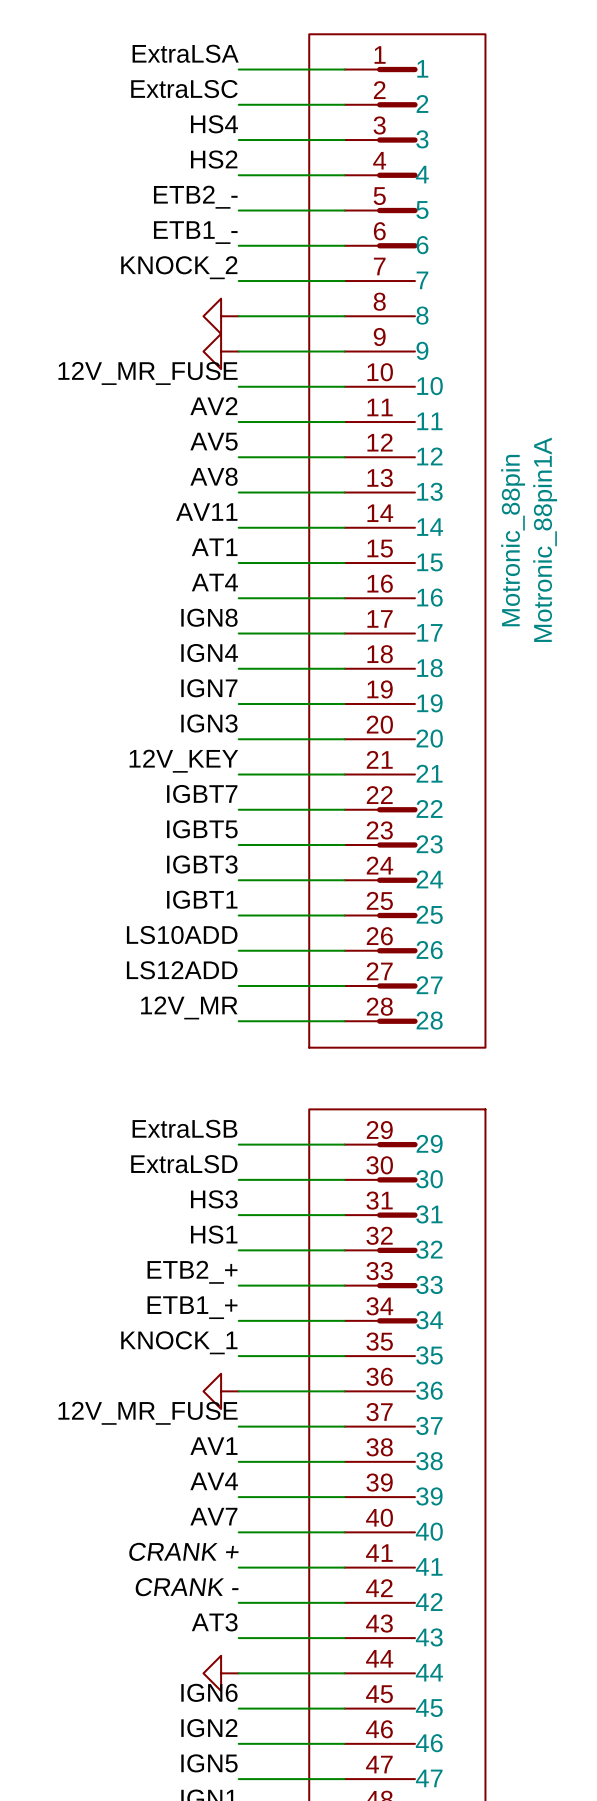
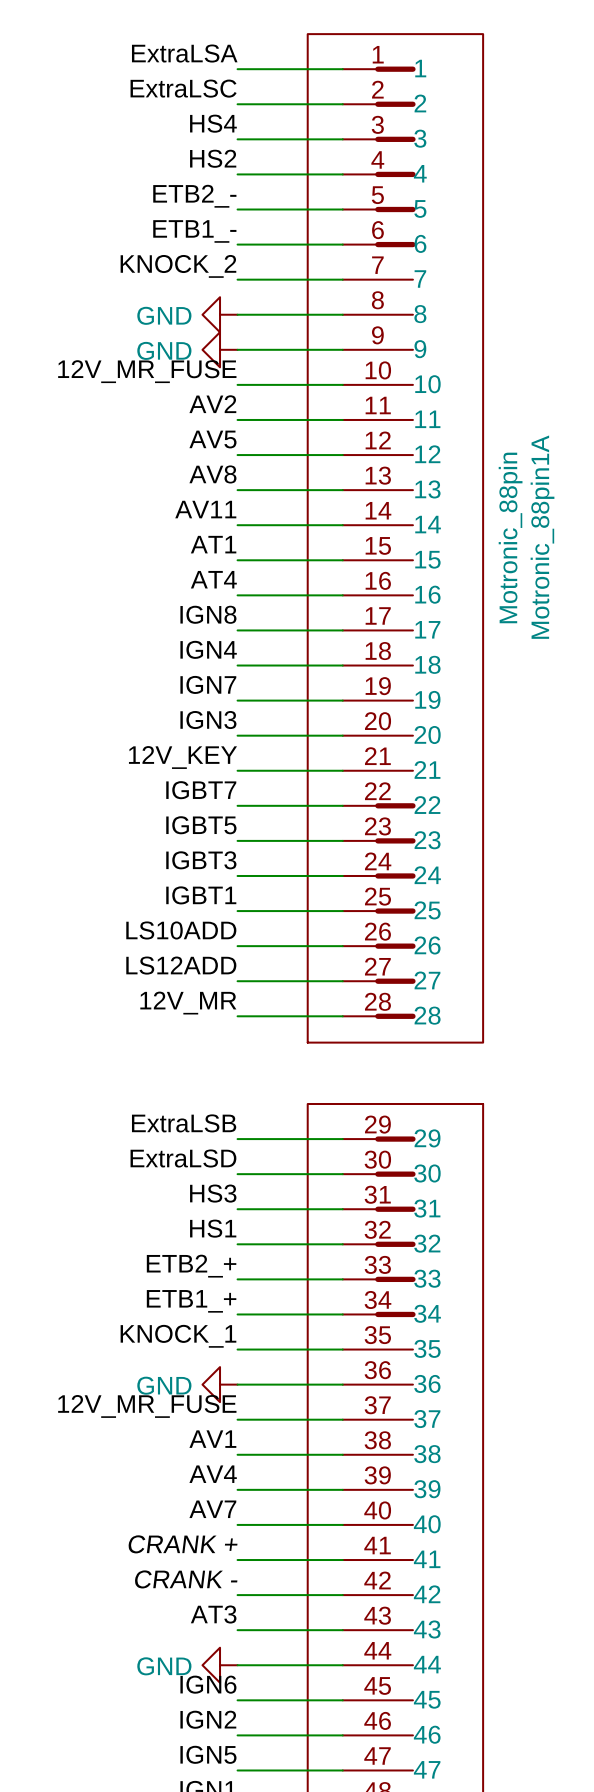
power symbol text: none -> GND (164, 315)
power symbol text: none -> GND (164, 350)
power symbol text: none -> GND (164, 1385)
power symbol text: none -> GND (164, 1666)

